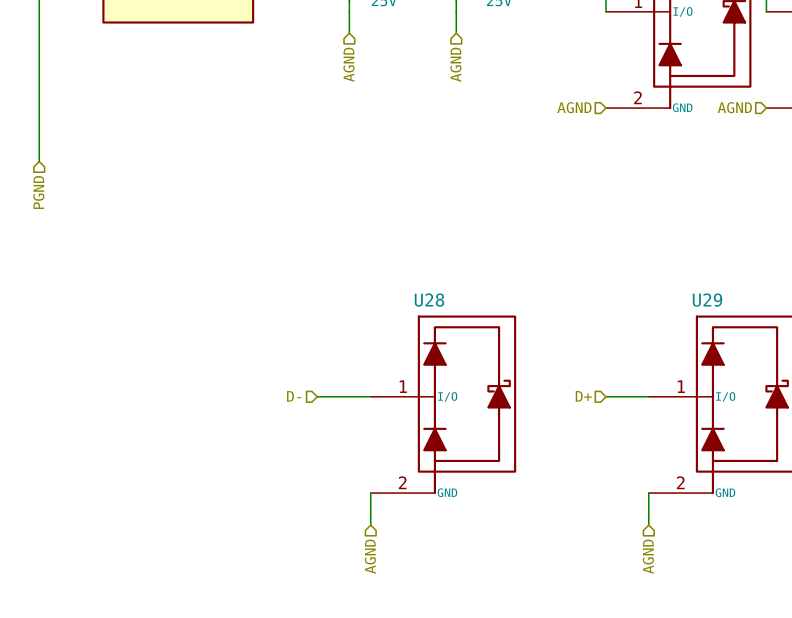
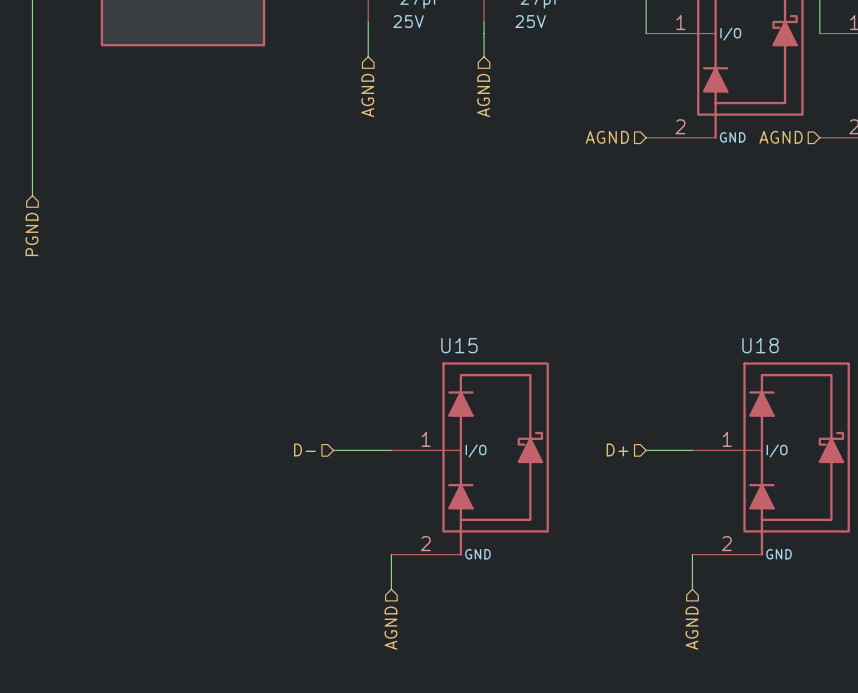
U28 name: U28 (429, 300) -> U15 (459, 345)
U29 name: U29 (707, 300) -> U18 (760, 345)

